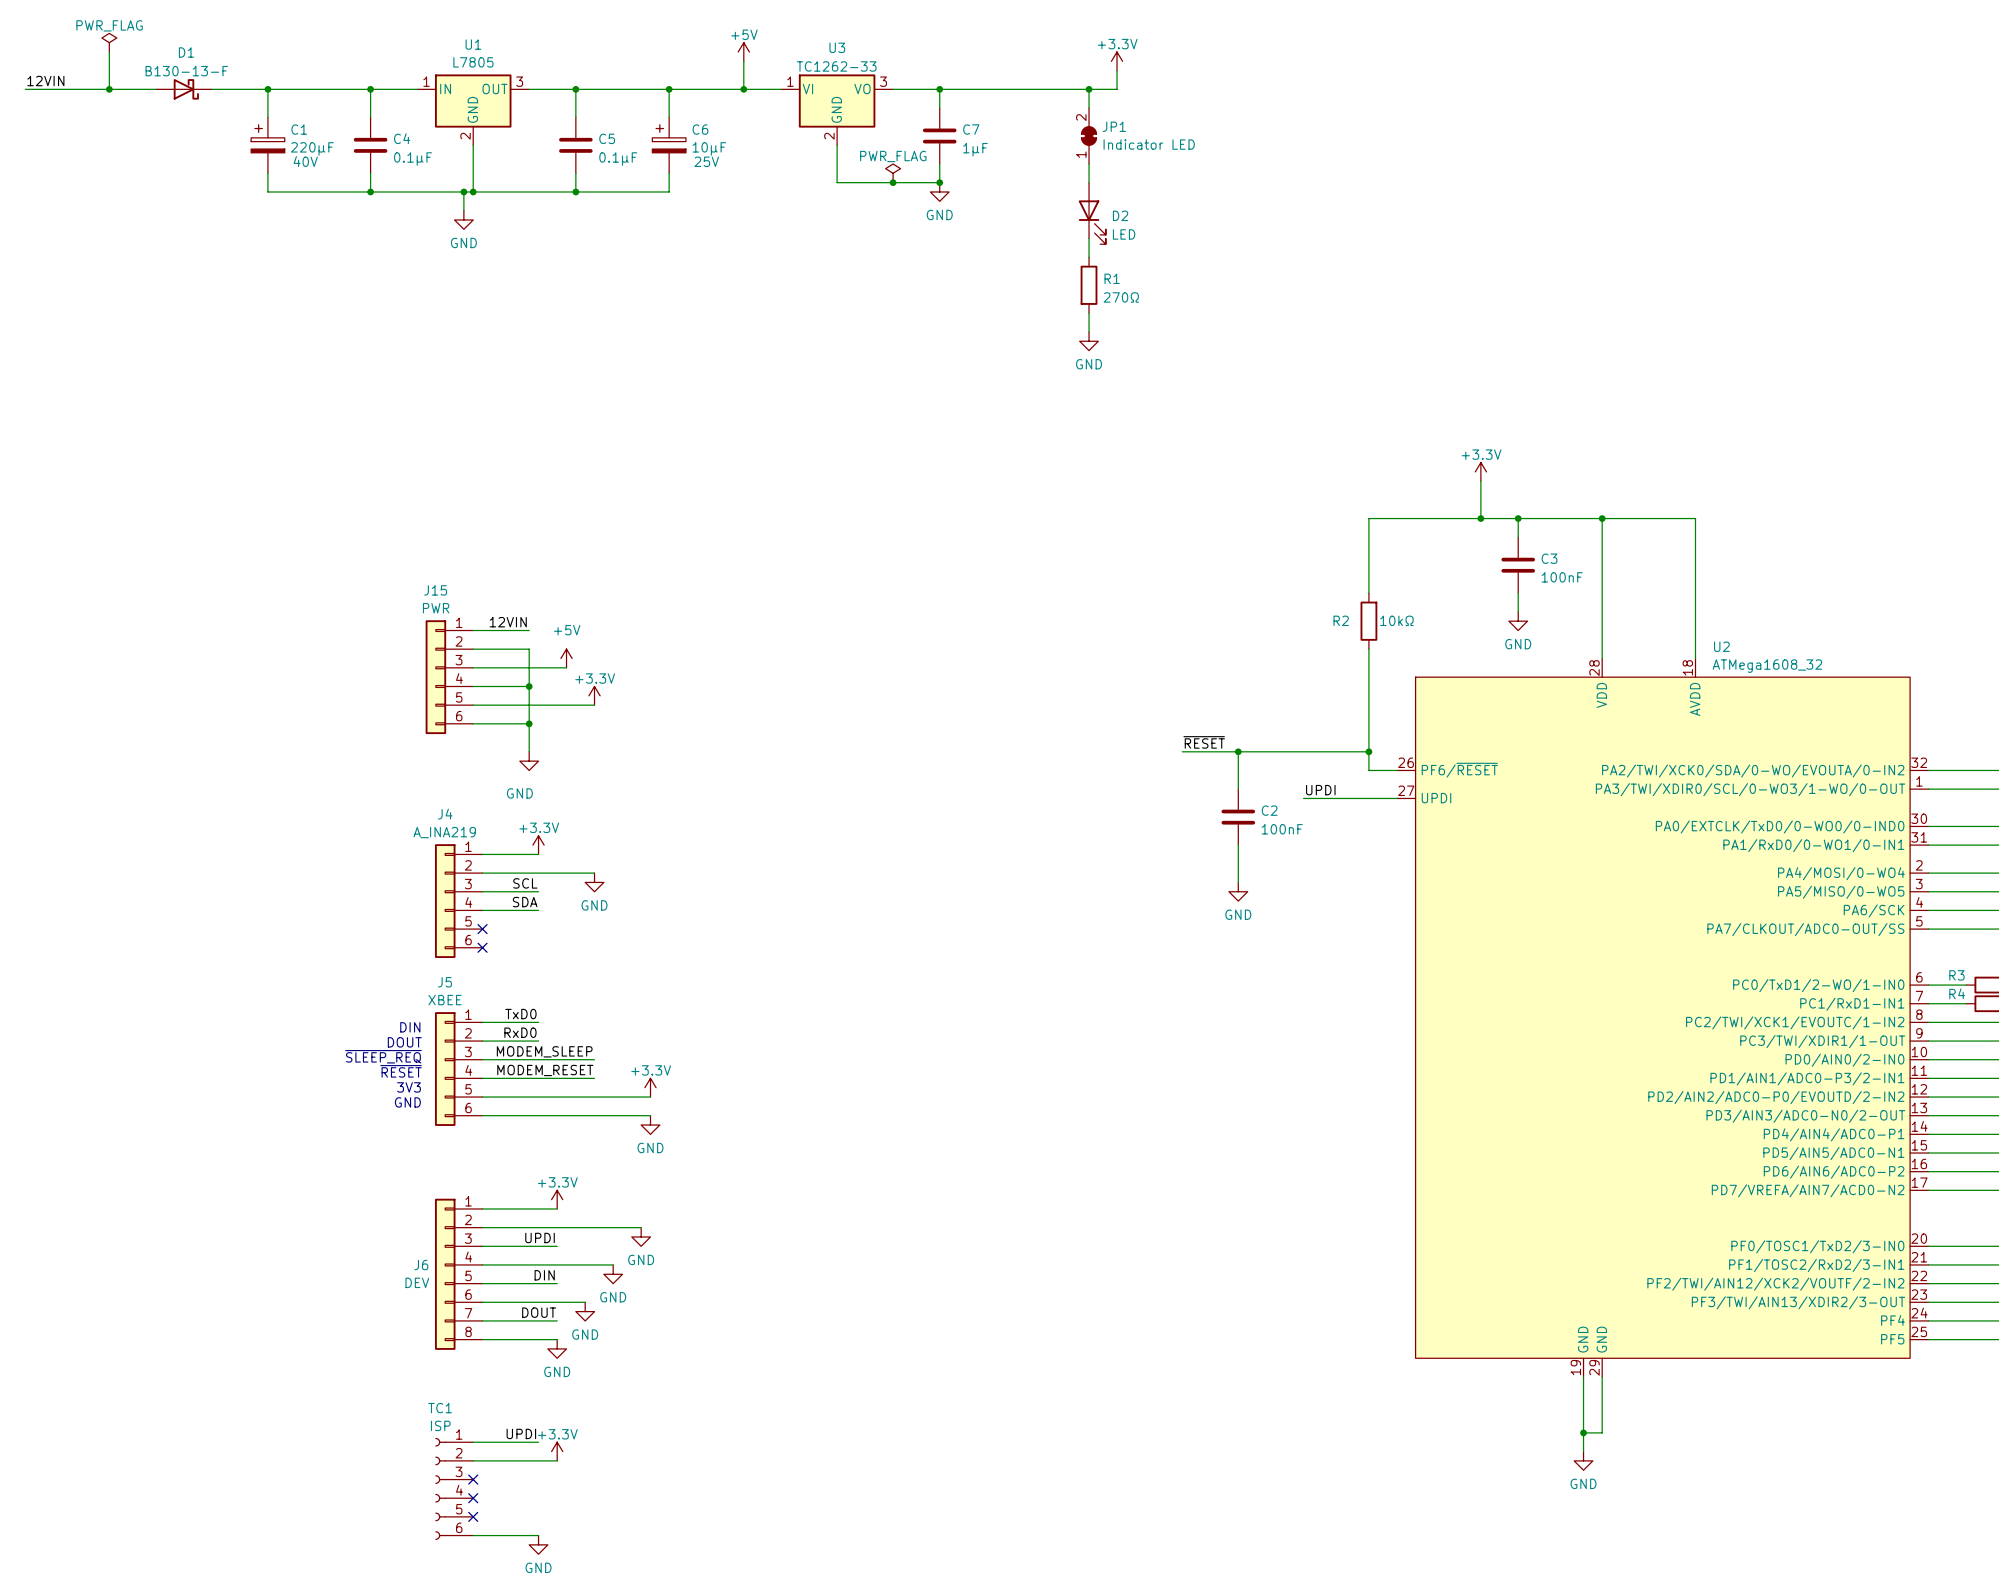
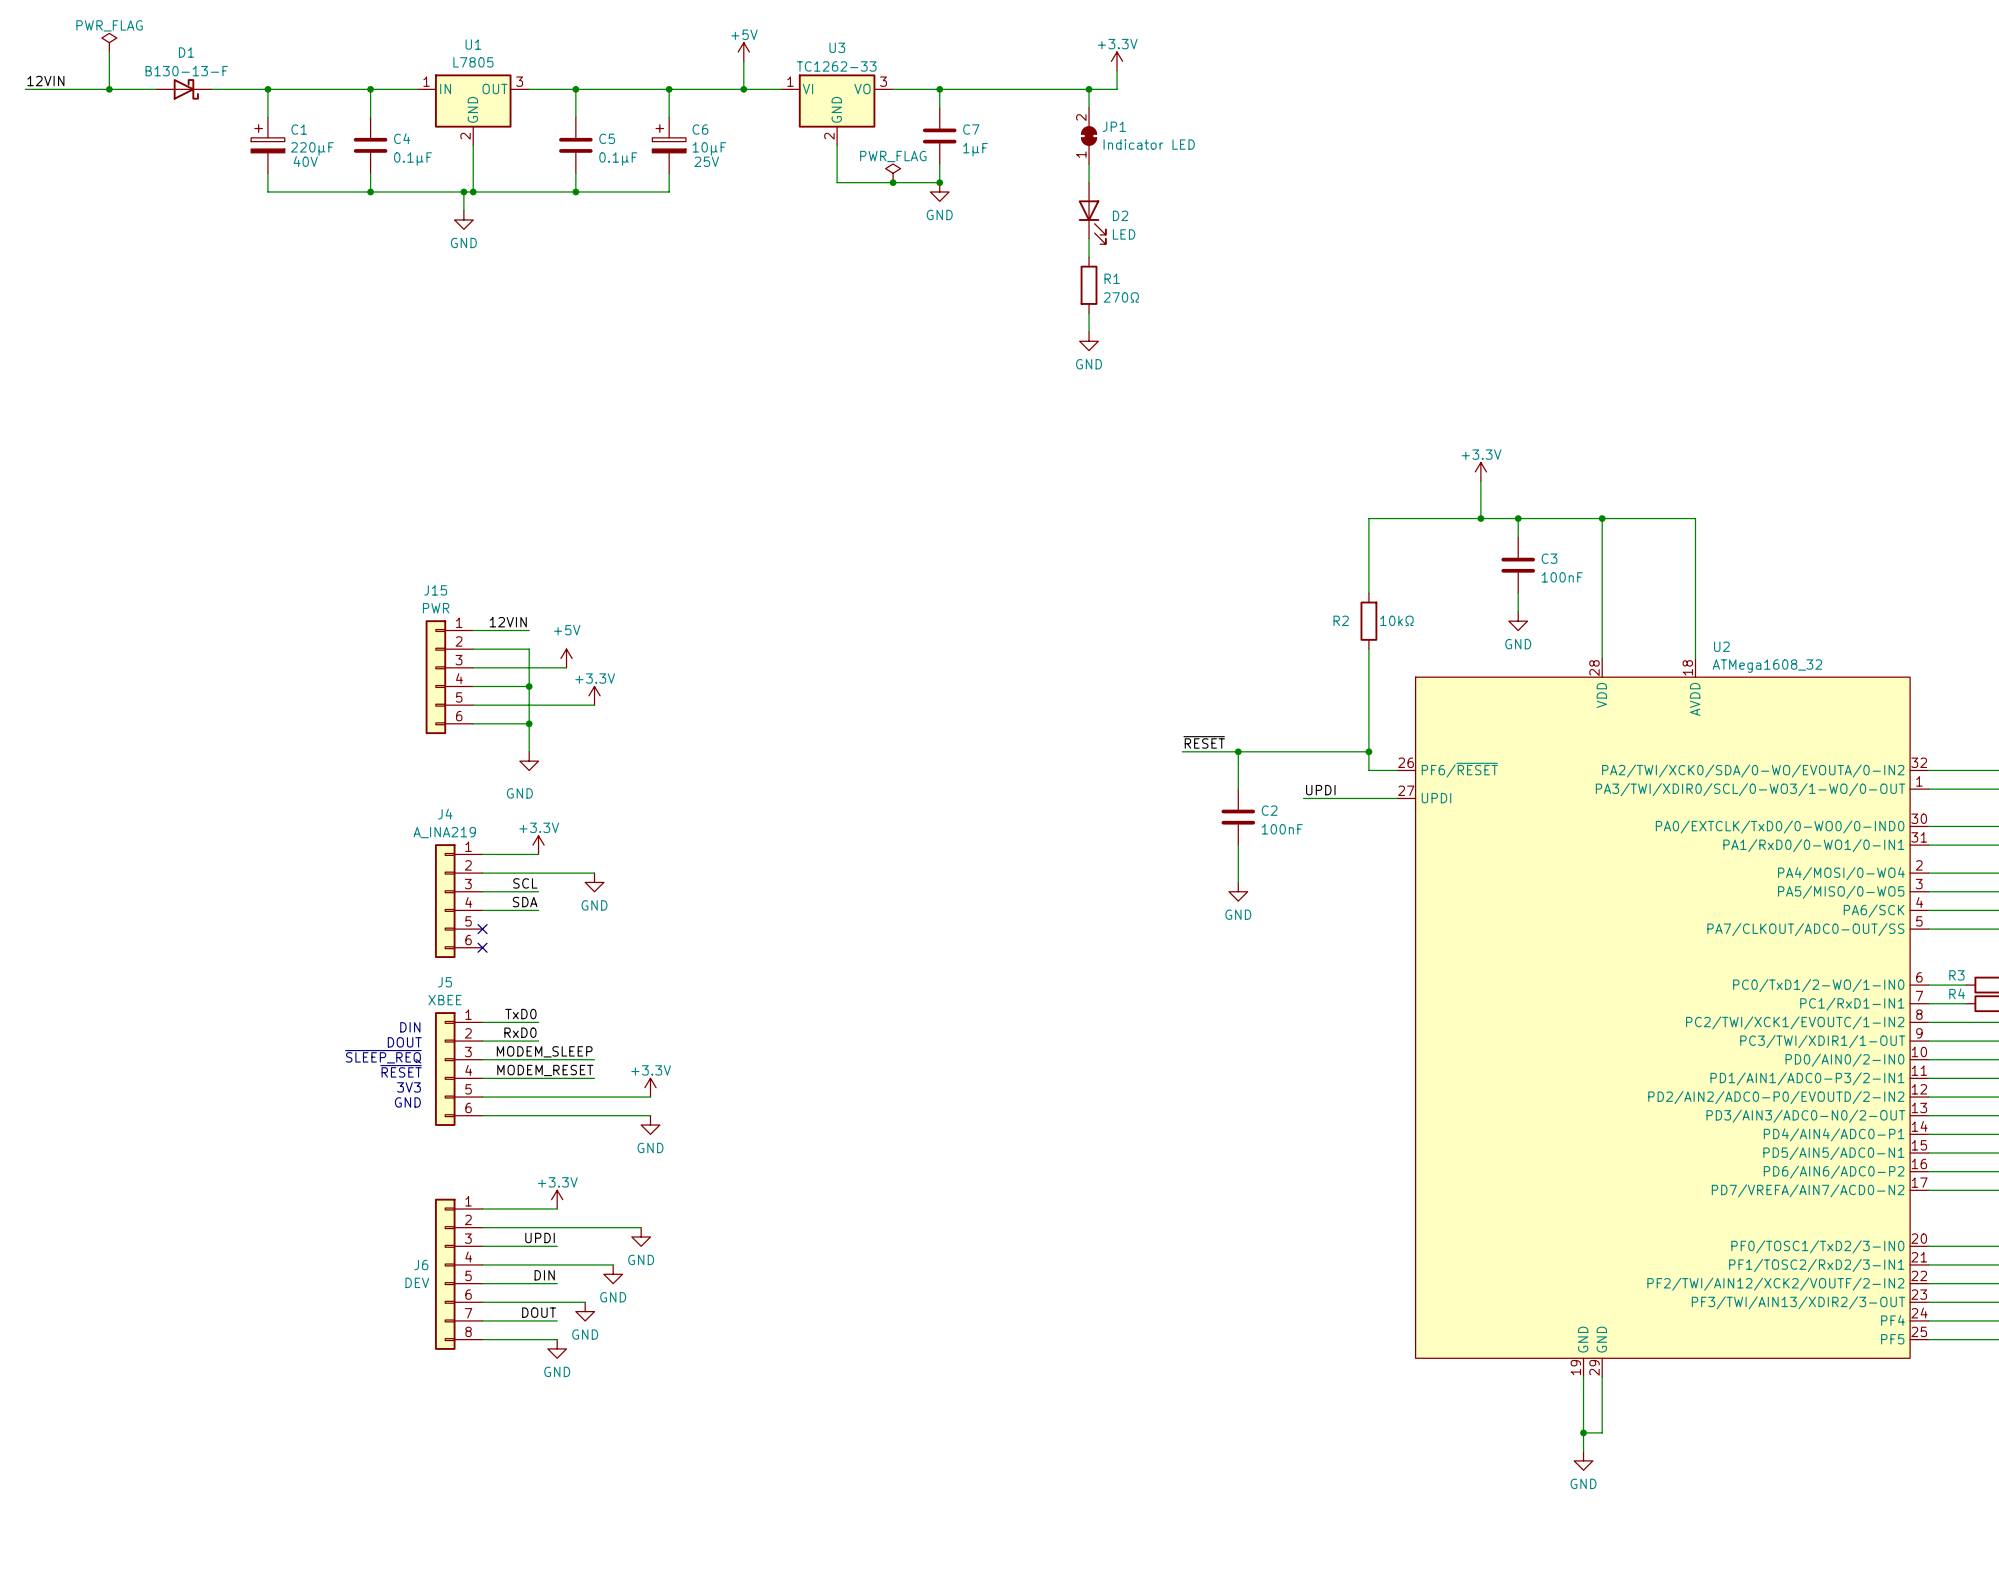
label: UPDI (521, 1433) -> none
wire: (473, 1442) (538, 1442) -> none
power symbol: +3.3V (557, 1451) -> none
wire: (473, 1460) (557, 1460) -> none
no-connect mark: (473, 1479) -> none
TC1: ISP (454, 1488) -> none
no-connect mark: (473, 1498) -> none
no-connect mark: (473, 1516) -> none
wire: (473, 1535) (538, 1535) -> none
power symbol: GND (538, 1544) -> none

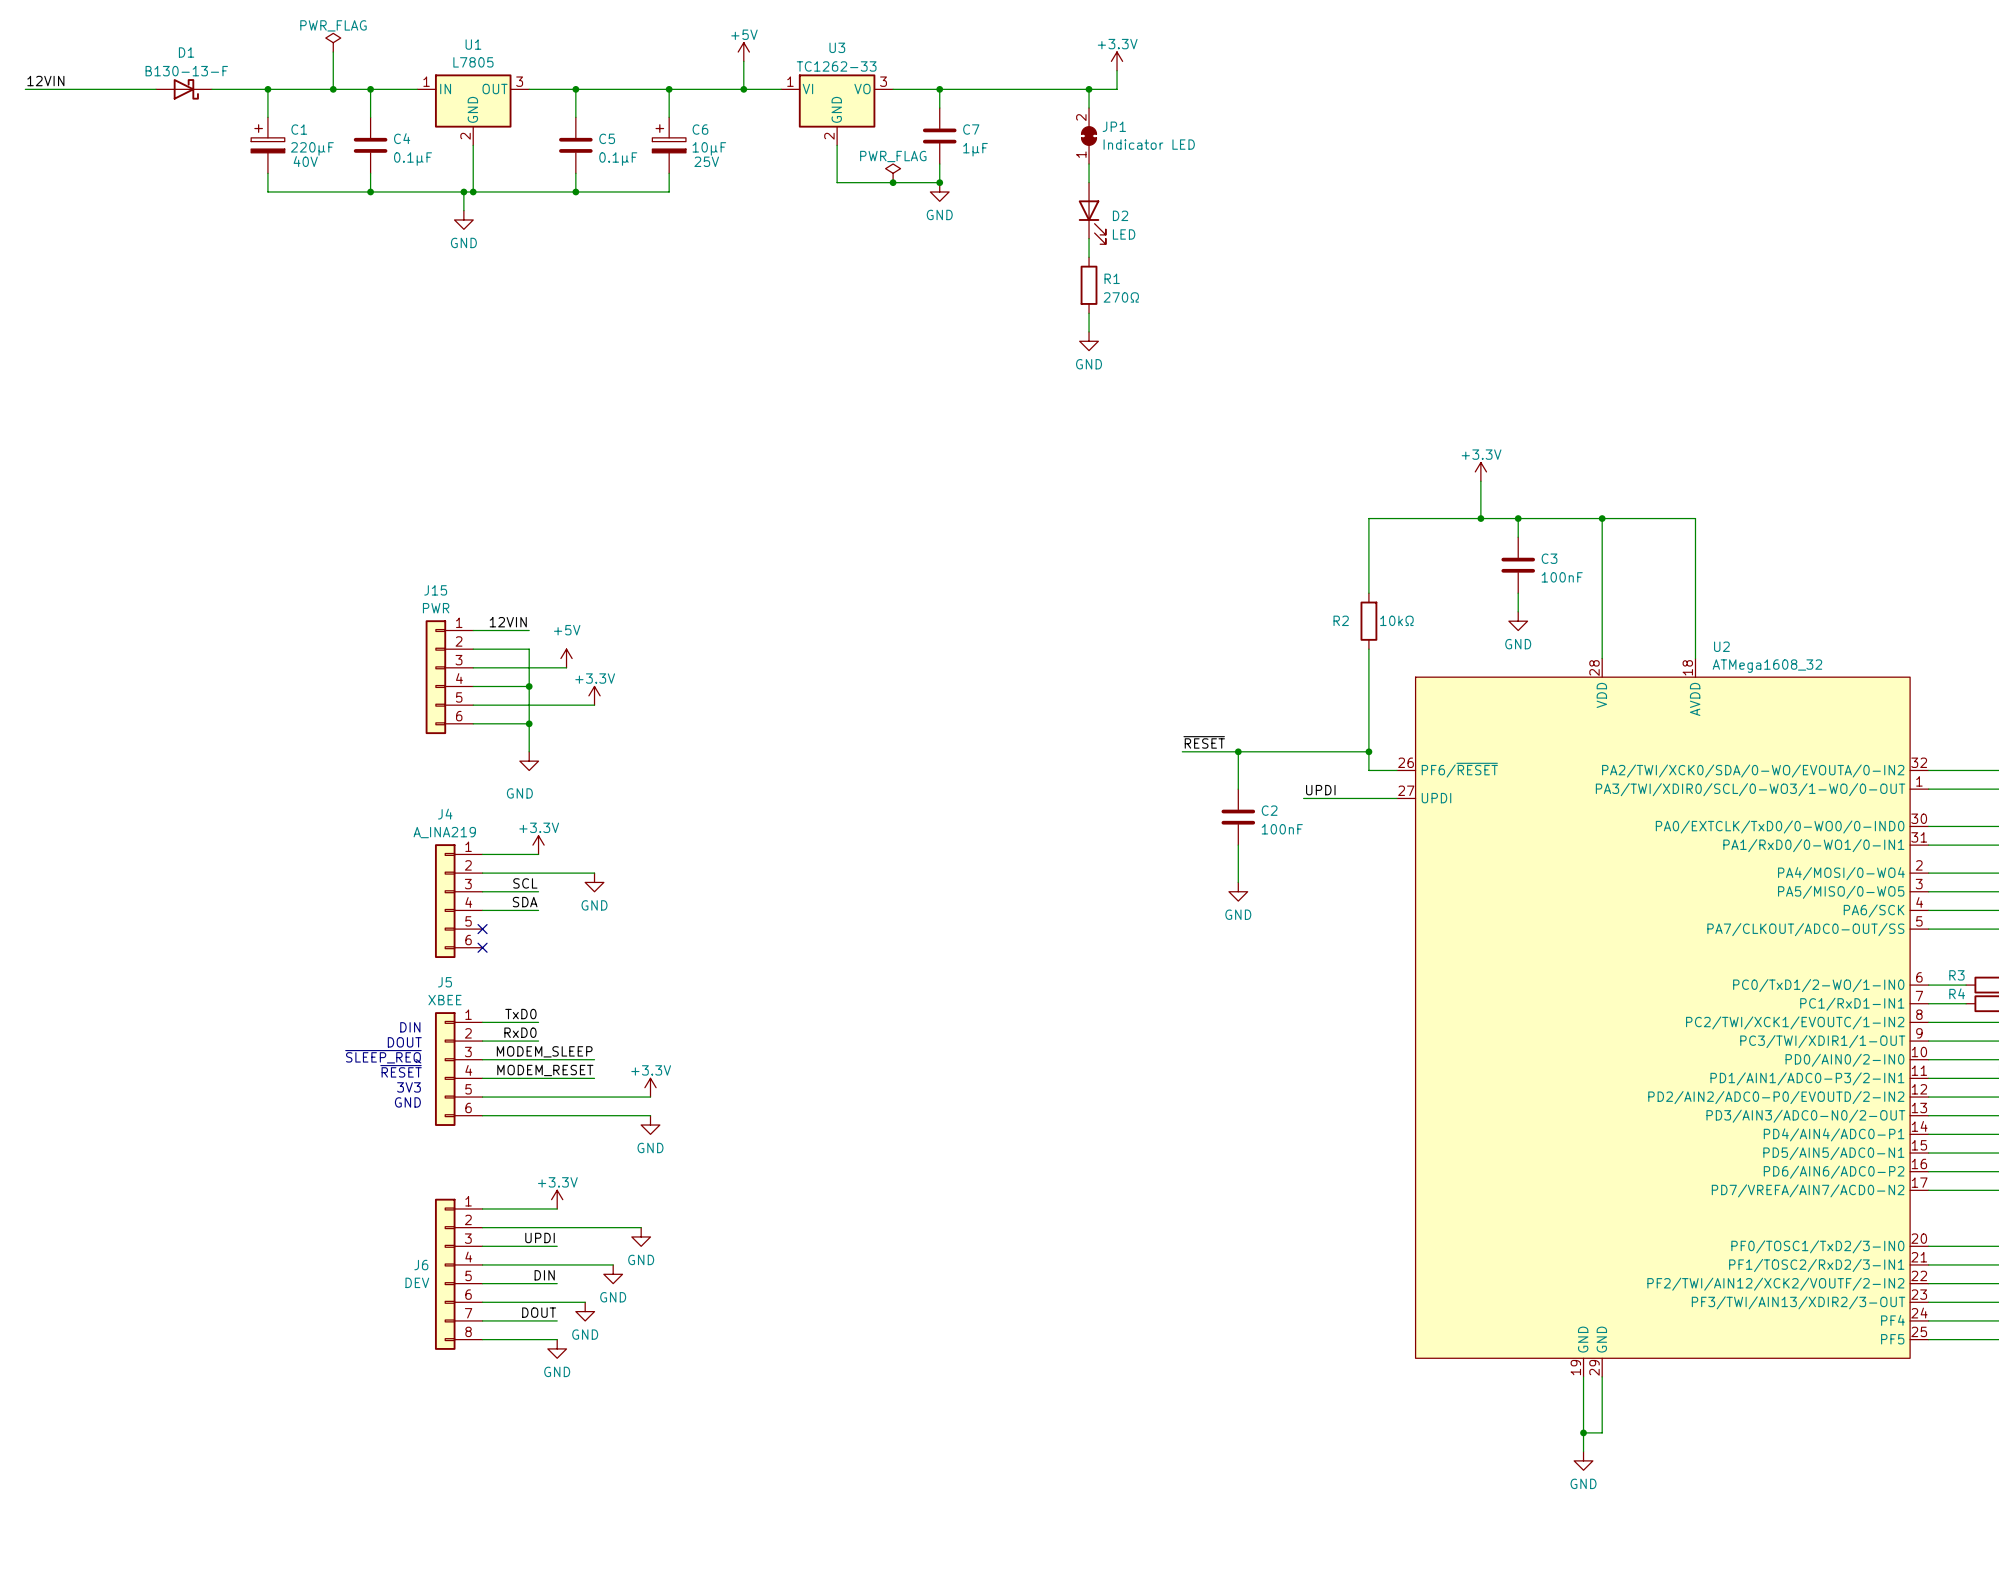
power symbol: PWR_FLAG (109, 42) -> none
power symbol: none -> PWR_FLAG (333, 42)
wire: (109, 52) (109, 89) -> none
wire: none -> (333, 52) (333, 89)
junction: (109, 89) -> none
junction: none -> (333, 89)

